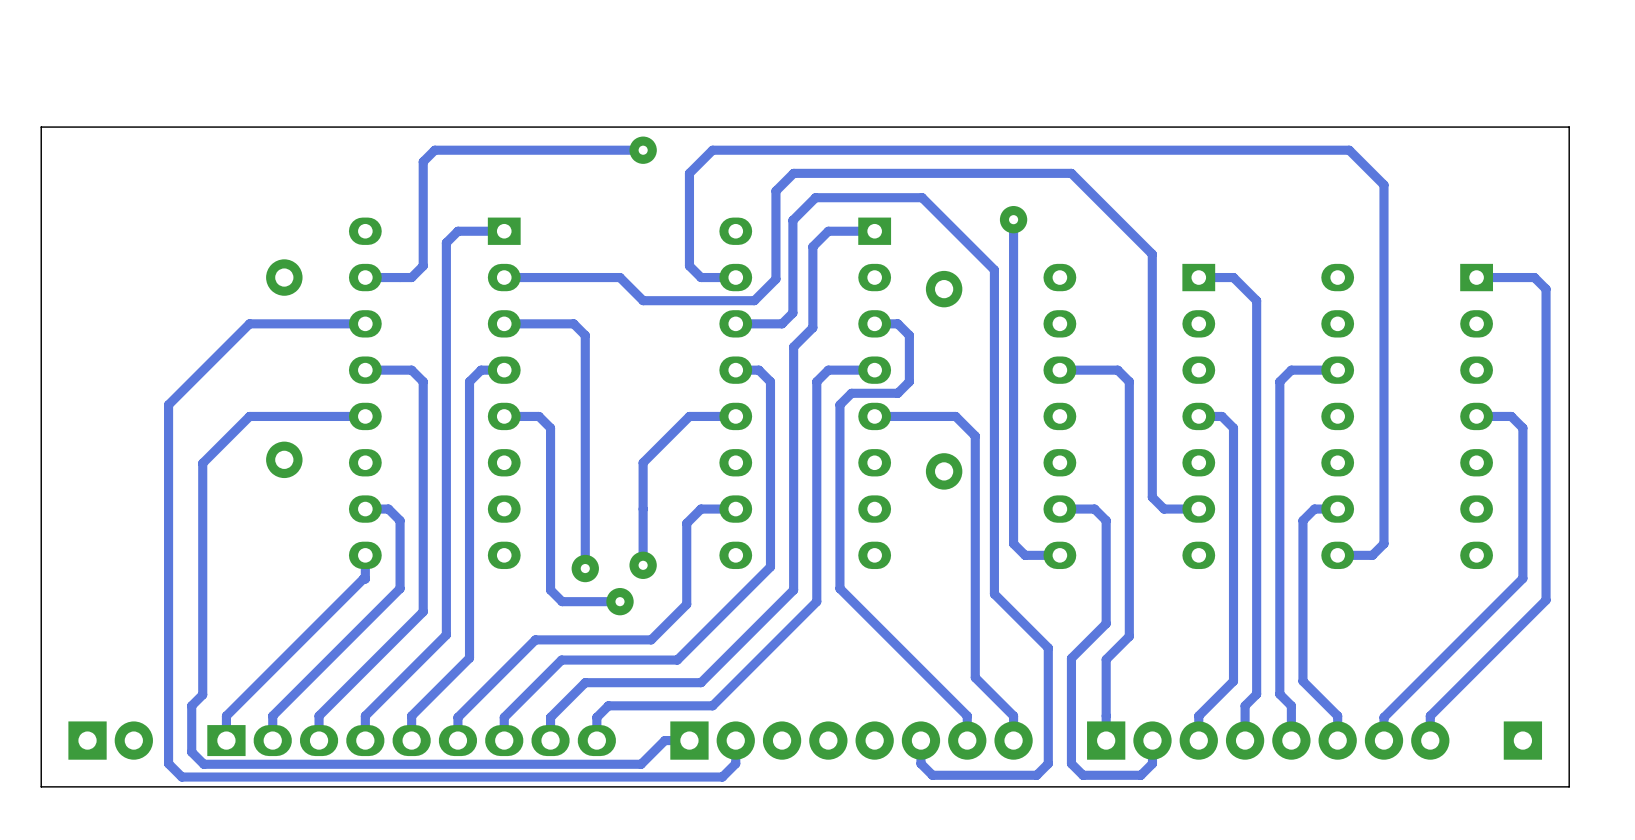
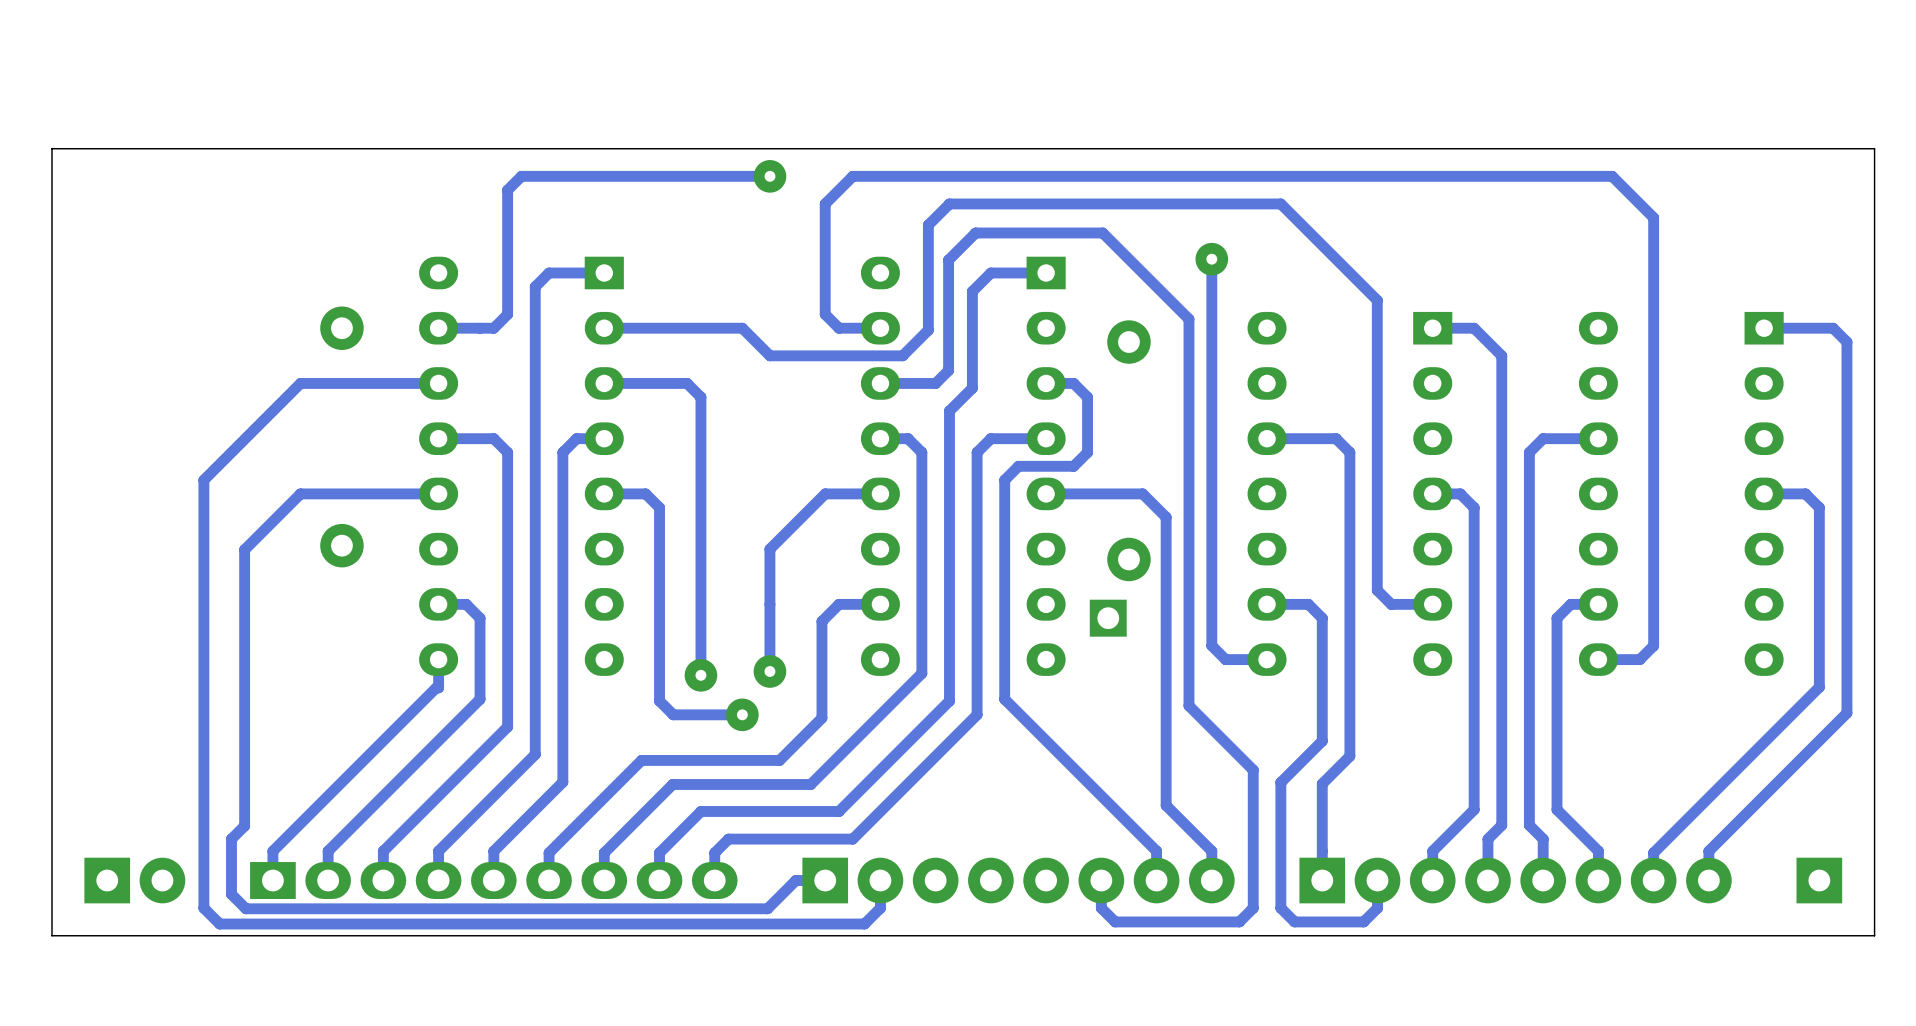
part: none -> (1108, 618)

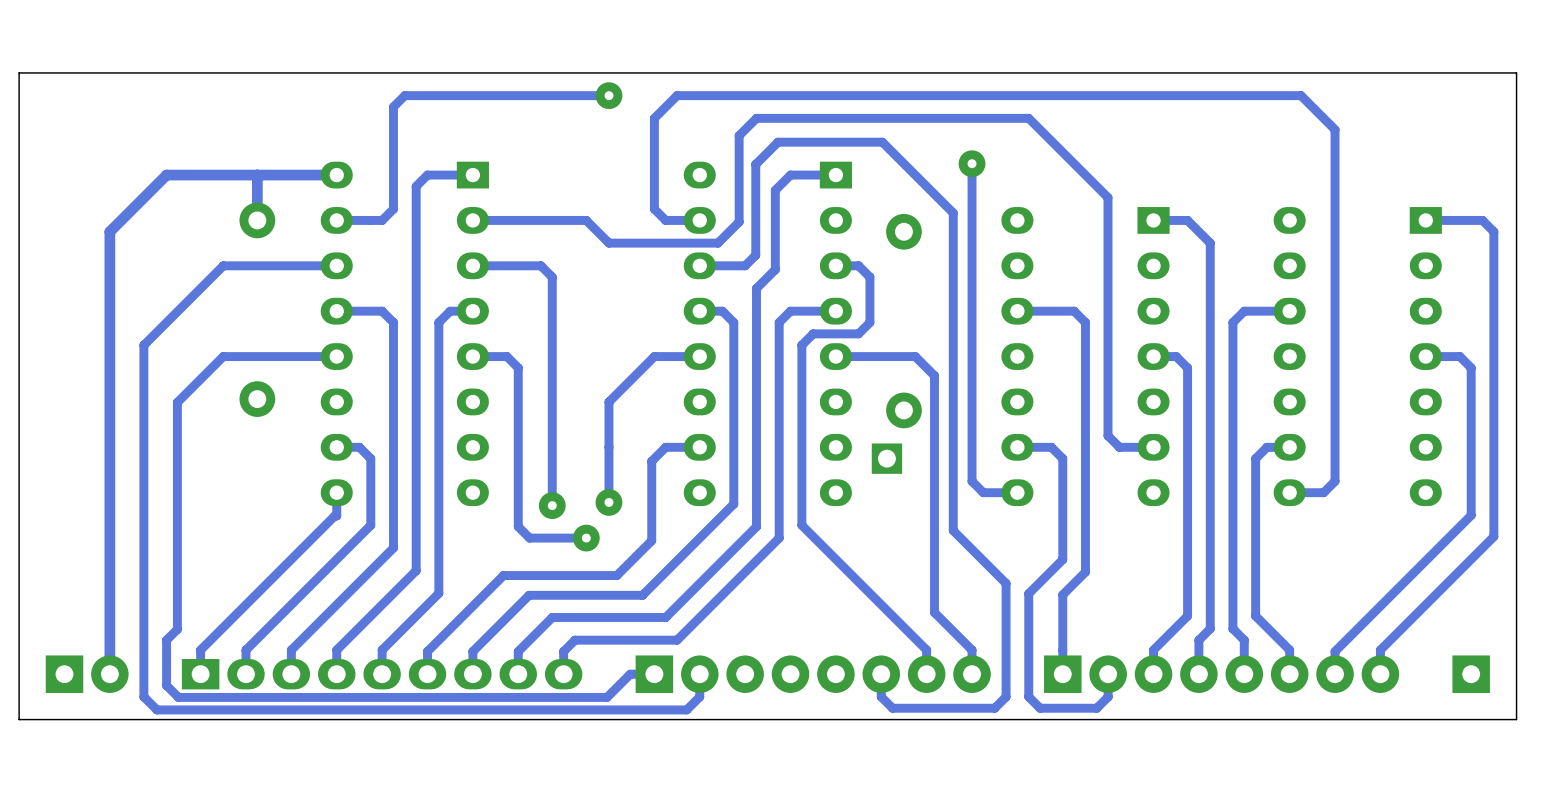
track: none -> (257, 175) (257, 220)
track: none -> (336, 175) (166, 175) (109, 231) (109, 674)

